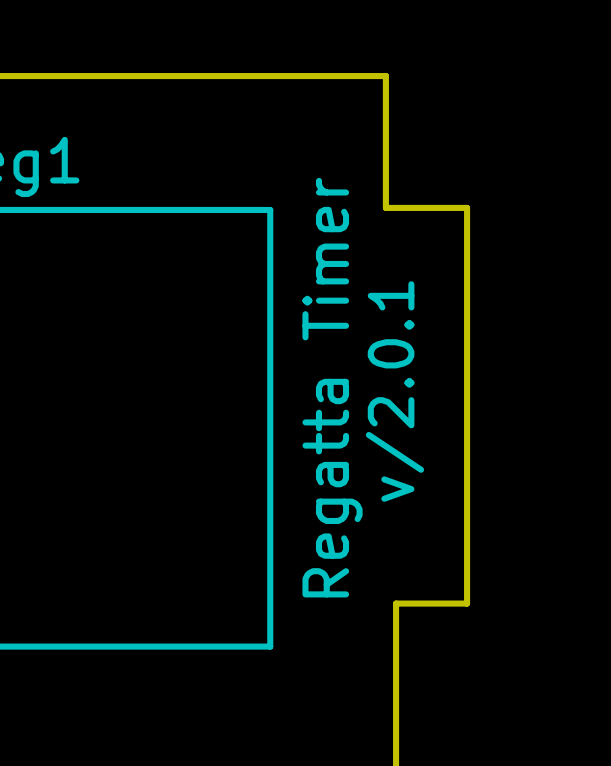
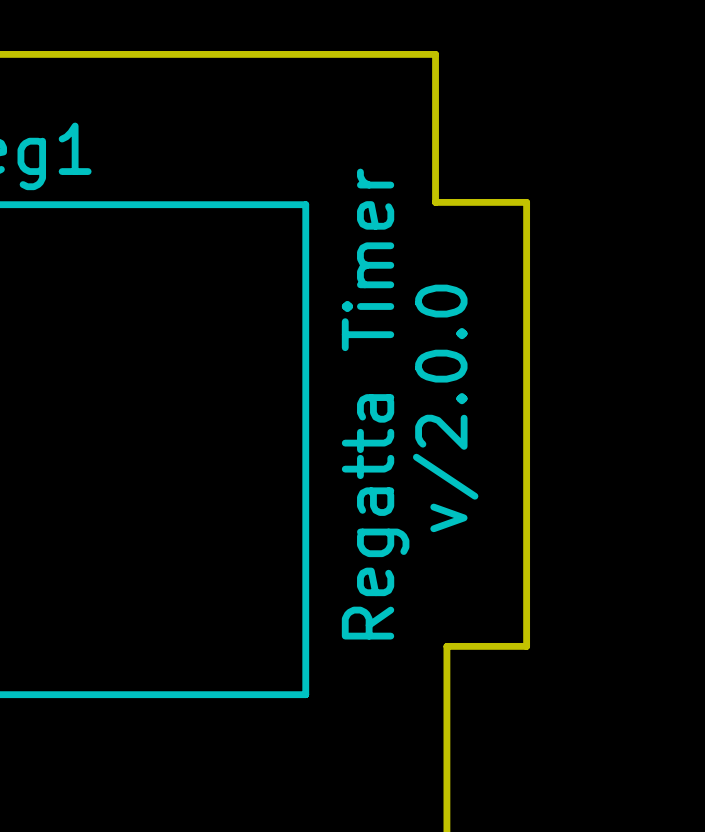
text: v/2.0.1 (394, 391) -> v/2.0.0 (445, 408)

